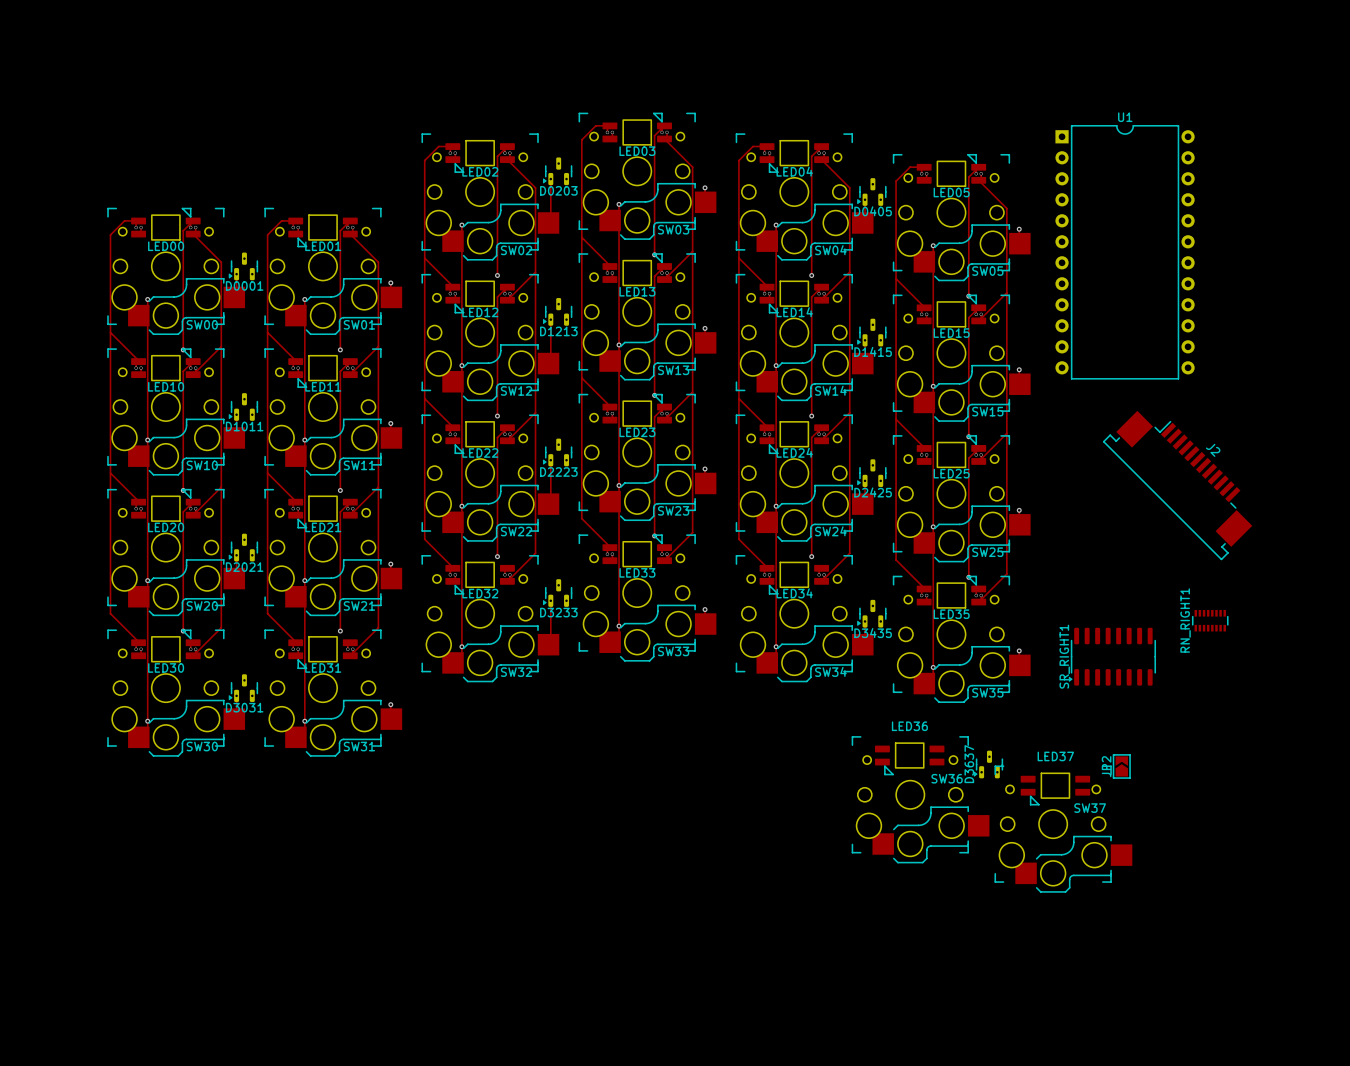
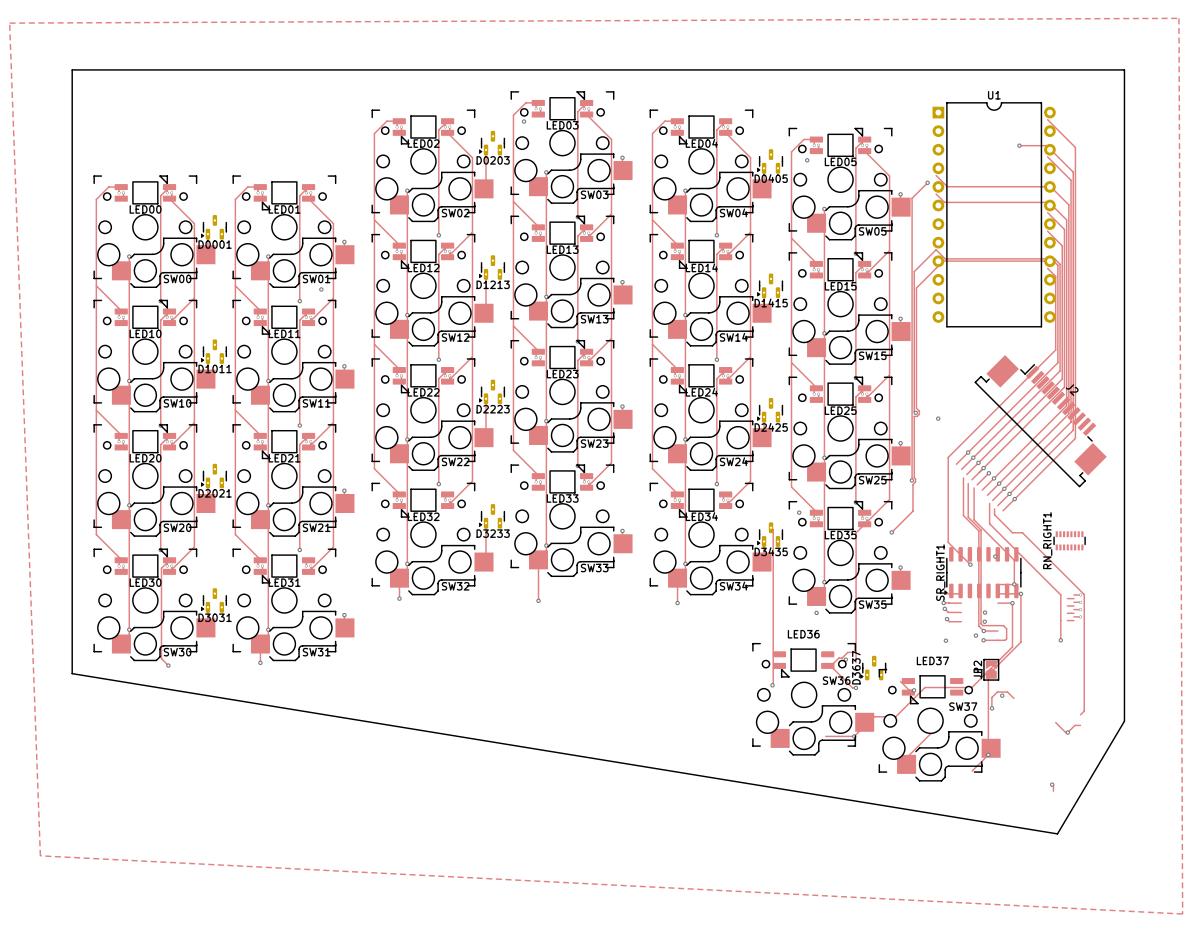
zone outline: none -> (1178, 18) (9, 23) (40, 855) (1182, 914) (1178, 18)
board edge: none -> (72, 69) (1124, 69) (1124, 721) (1057, 833) (72, 673) (72, 69)
track: none -> (1047, 119) (1075, 147) (1075, 438) (1003, 510)
via: none -> (524, 121)
track: none -> (1019, 145) (1046, 145) (1073, 172) (1073, 430) (997, 505)
via: none -> (1019, 145)
track: none -> (1047, 156) (1071, 180) (1071, 422) (992, 500)
via: none -> (807, 160)
track: none -> (936, 175) (947, 186) (1050, 186) (1068, 204) (1068, 413) (987, 495)
track: none -> (927, 182) (912, 198) (911, 480)
via: none -> (927, 182)
track: none -> (936, 194) (944, 202) (1049, 202) (1066, 219) (1066, 405) (982, 490)
track: none -> (1047, 212) (1064, 229) (1064, 387) (971, 479)
track: none -> (1047, 231) (1062, 245) (1062, 379) (966, 474)
track: none -> (1047, 268) (1055, 276) (1055, 349) (948, 457) (948, 542) (970, 564)
via: none -> (321, 289)
track: none -> (915, 412) (914, 271) (936, 249) (945, 258) (1054, 258) (1060, 264) (1060, 370) (961, 469)
via: none -> (915, 412)
via: none -> (938, 418)
via: none -> (968, 452)
via: none -> (973, 457)
via: none -> (978, 462)
track: none -> (956, 464) (1057, 362) (1057, 265) (1053, 261) (943, 261) (916, 288) (916, 408) (919, 414) (914, 416) (915, 481) (912, 484) (912, 511) (891, 532)
via: none -> (983, 468)
track: none -> (988, 473) (977, 484)
via: none -> (988, 473)
track: none -> (963, 477) (963, 515) (978, 530) (978, 626) (983, 631) (997, 631)
via: none -> (994, 478)
via: none -> (911, 480)
track: none -> (968, 483) (968, 517) (981, 530) (981, 623) (982, 625) (1003, 625) (1006, 628) (1005, 640) (983, 640)
via: none -> (999, 483)
track: none -> (974, 487) (974, 519) (1014, 560) (1014, 584) (997, 584)
via: none -> (1004, 488)
via: none -> (1009, 493)
via: none -> (1014, 499)
track: none -> (989, 503) (989, 523) (1060, 594) (1060, 640)
track: none -> (994, 508) (994, 514) (1012, 532) (1022, 532) (1084, 594) (1084, 711) (1080, 714)
via: none -> (799, 512)
track: none -> (864, 524) (856, 532) (856, 662)
track: none -> (771, 527) (773, 529) (772, 685)
via: none -> (891, 532)
via: none -> (995, 556)
track: none -> (169, 560) (161, 568) (161, 658) (168, 665)
track: none -> (538, 559) (538, 600)
via: none -> (970, 564)
track: none -> (399, 578) (399, 598)
track: none -> (677, 578) (677, 603)
via: none -> (1014, 584)
track: none -> (944, 593) (961, 593)
track: none -> (997, 593) (1020, 593) (1020, 642) (988, 674) (988, 754) (972, 771)
via: none -> (1020, 593)
track: none -> (1073, 594) (1080, 594)
via: none -> (1080, 594)
via: none -> (399, 598)
track: none -> (1067, 598) (1073, 598)
via: none -> (538, 600)
track: none -> (1073, 602) (1080, 602)
via: none -> (1080, 602)
via: none -> (677, 603)
track: none -> (943, 603) (961, 603)
via: none -> (943, 603)
track: none -> (997, 603) (1012, 603) (1012, 646) (971, 687) (925, 687) (895, 716) (873, 716) (854, 736) (825, 736)
via: none -> (1012, 603)
track: none -> (1067, 605) (1073, 605)
track: none -> (944, 608) (948, 612) (961, 612)
via: none -> (944, 608)
track: none -> (1073, 609) (1080, 609)
via: none -> (1080, 609)
via: none -> (985, 612)
via: none -> (816, 612)
track: none -> (1067, 613) (1073, 613)
track: none -> (1073, 616) (1080, 616)
via: none -> (1080, 616)
track: none -> (947, 619) (949, 621) (961, 621)
via: none -> (947, 619)
track: none -> (1067, 620) (1073, 620)
via: none -> (984, 621)
via: none -> (983, 631)
via: none -> (975, 635)
via: none -> (945, 640)
via: none -> (983, 640)
via: none -> (1060, 640)
track: none -> (260, 644) (260, 662)
track: none -> (856, 652) (847, 652) (833, 663) (833, 668) (852, 687) (855, 687)
via: none -> (845, 659)
via: none -> (260, 662)
via: none -> (168, 665)
track: none -> (900, 681) (909, 690) (914, 690)
via: none -> (772, 685)
via: none -> (855, 687)
via: none -> (914, 690)
via: none -> (1002, 695)
track: none -> (1013, 698) (1007, 692) (997, 692) (991, 697) (992, 708)
via: none -> (992, 708)
track: none -> (931, 715) (931, 733) (906, 757)
track: none -> (1055, 722) (1065, 732) (1074, 725) (1080, 725)
via: none -> (1067, 732)
via: none -> (854, 736)
via: none -> (988, 754)
track: none -> (1052, 784) (1053, 791)
via: none -> (1052, 784)

